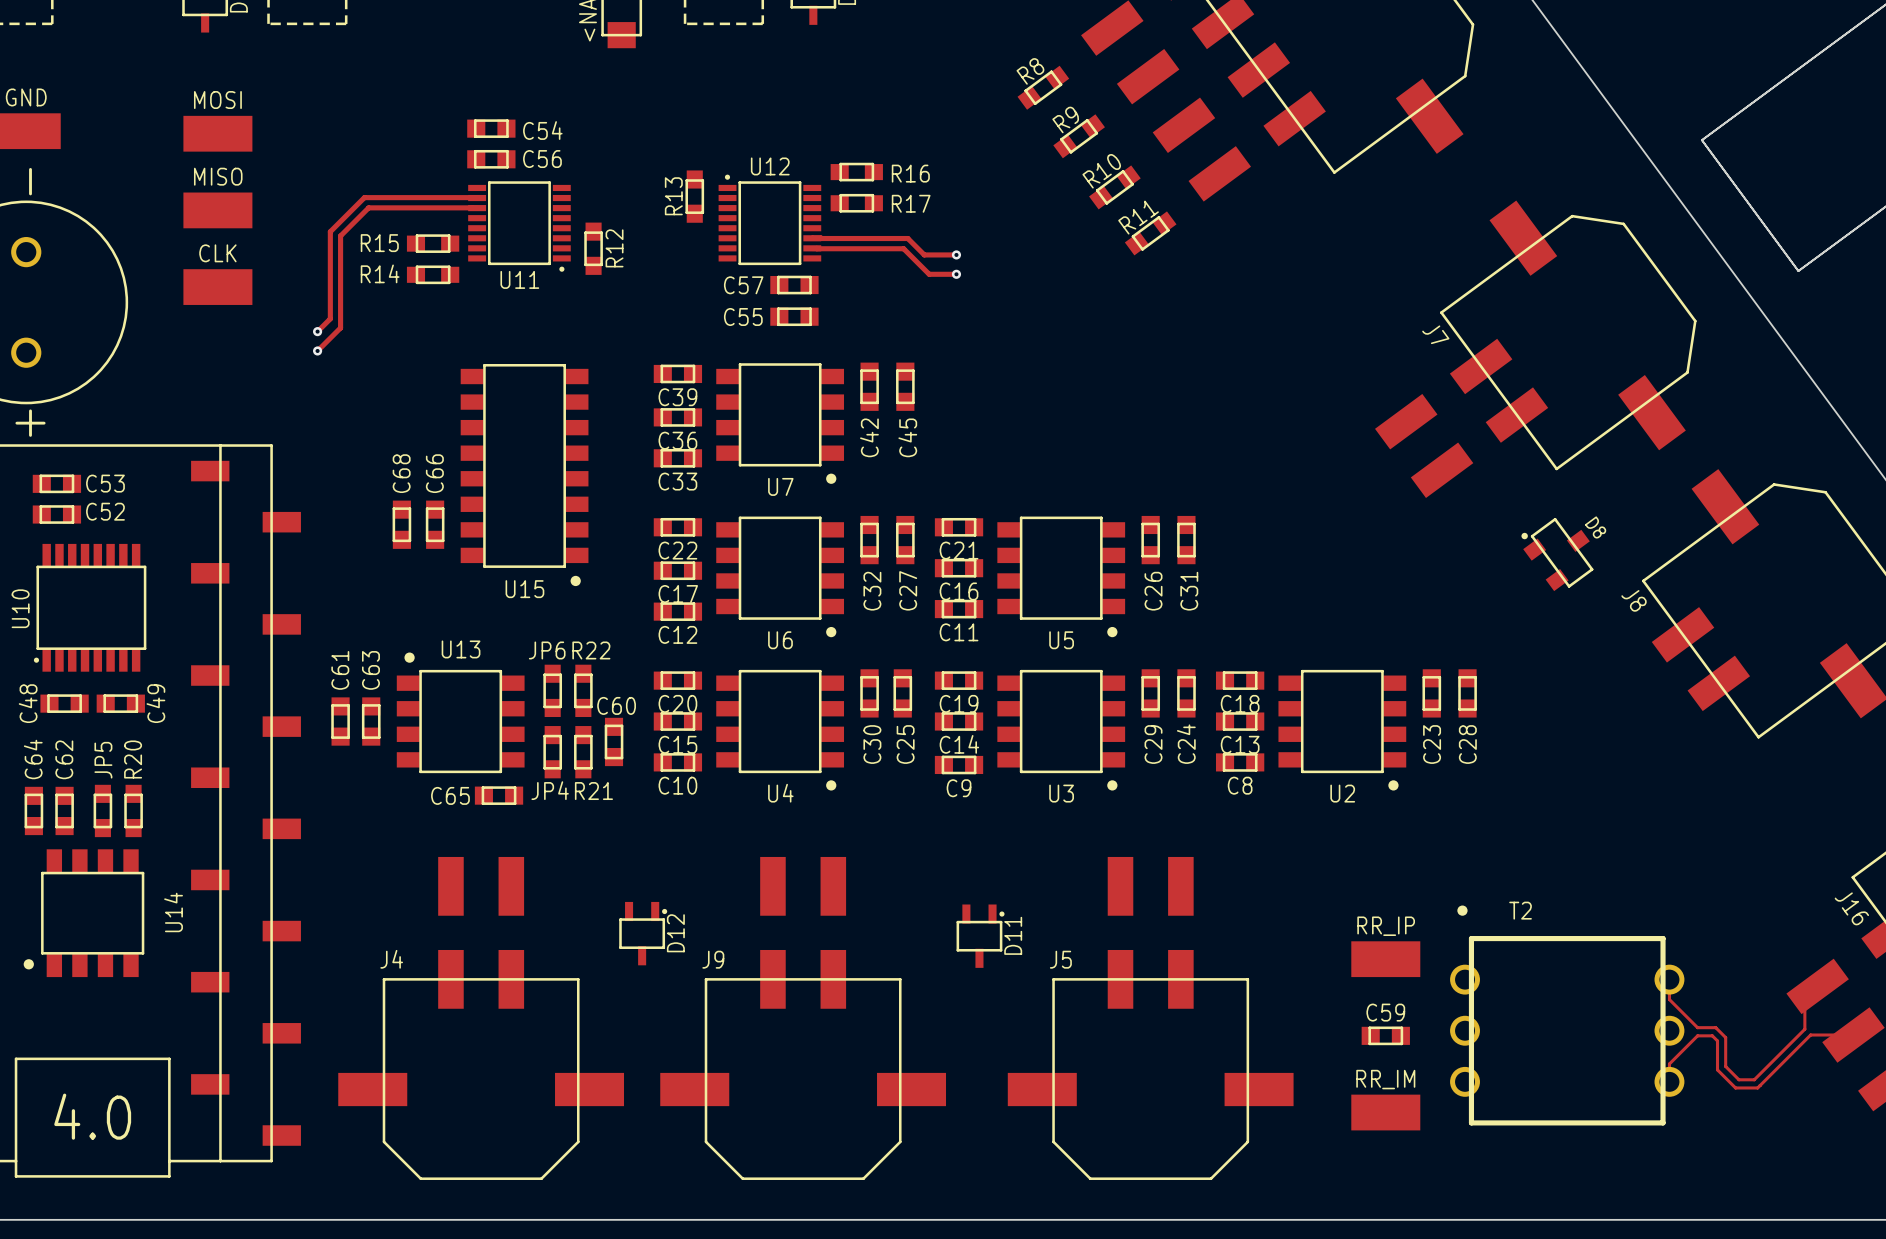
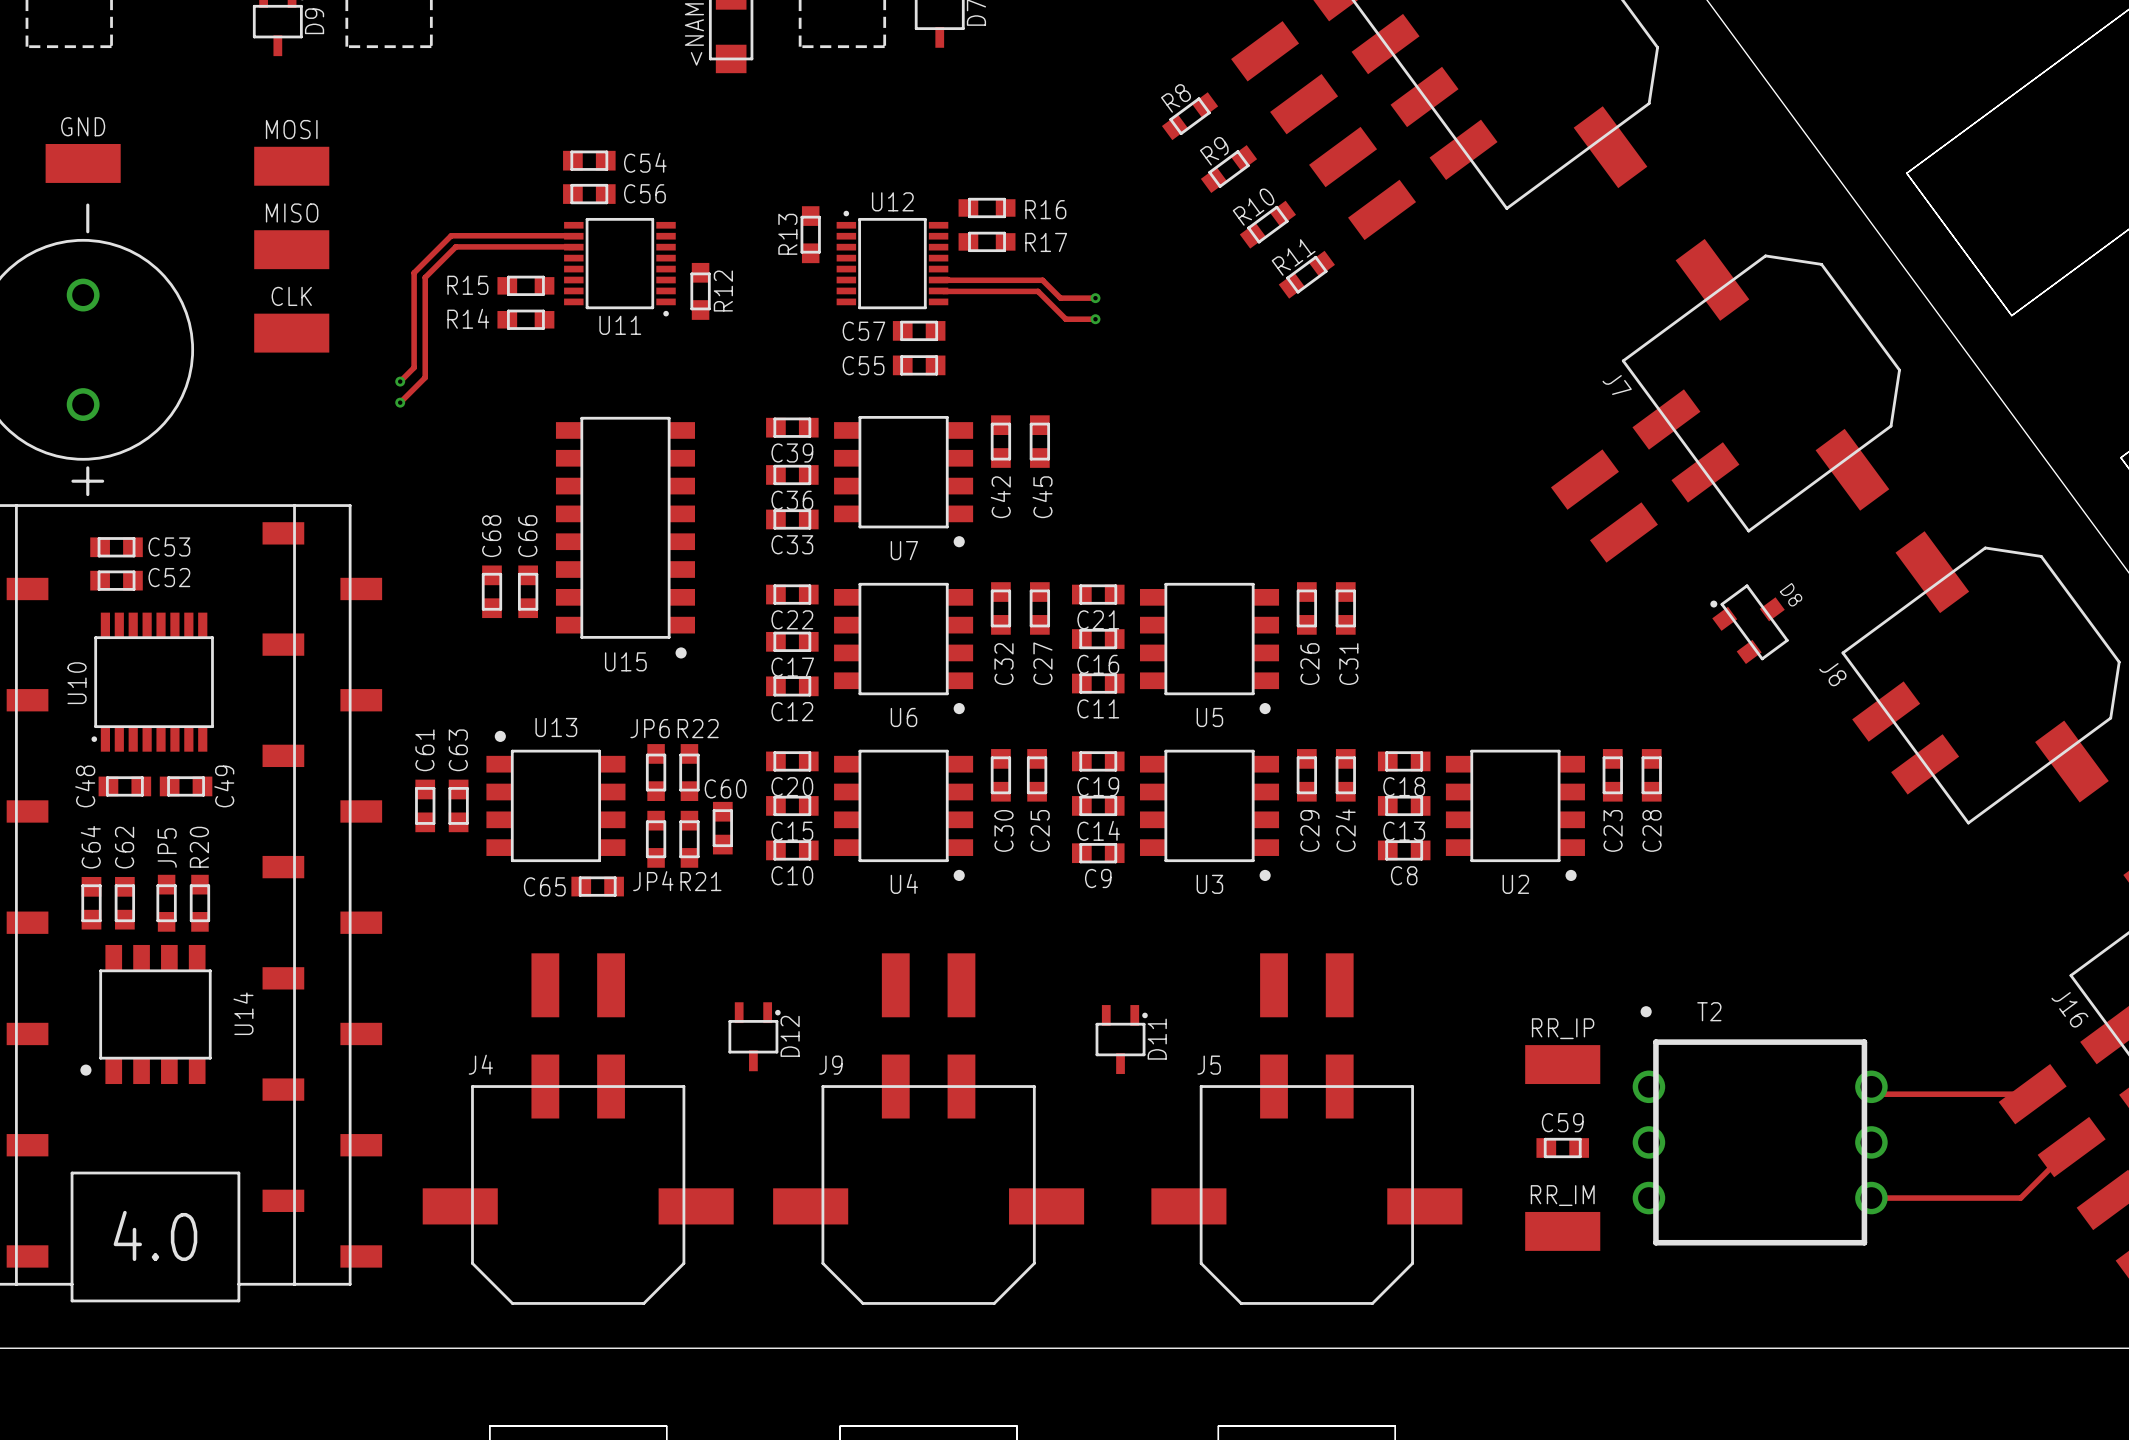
track: (1669, 979) (1669, 999) (1697, 1027) (1715, 1027) (1725, 1037) (1725, 1066) (1738, 1079) (1754, 1079) (1804, 1029) (1804, 999) (1817, 986) -> (1871, 1086) (1878, 1094) (2032, 1094)
track: (1853, 1035) (1810, 1035) (1757, 1087) (1735, 1087) (1717, 1069) (1717, 1040) (1712, 1035) (1697, 1035) (1669, 1063) (1669, 1081) -> (2070, 1147) (2020, 1198) (1871, 1198)

